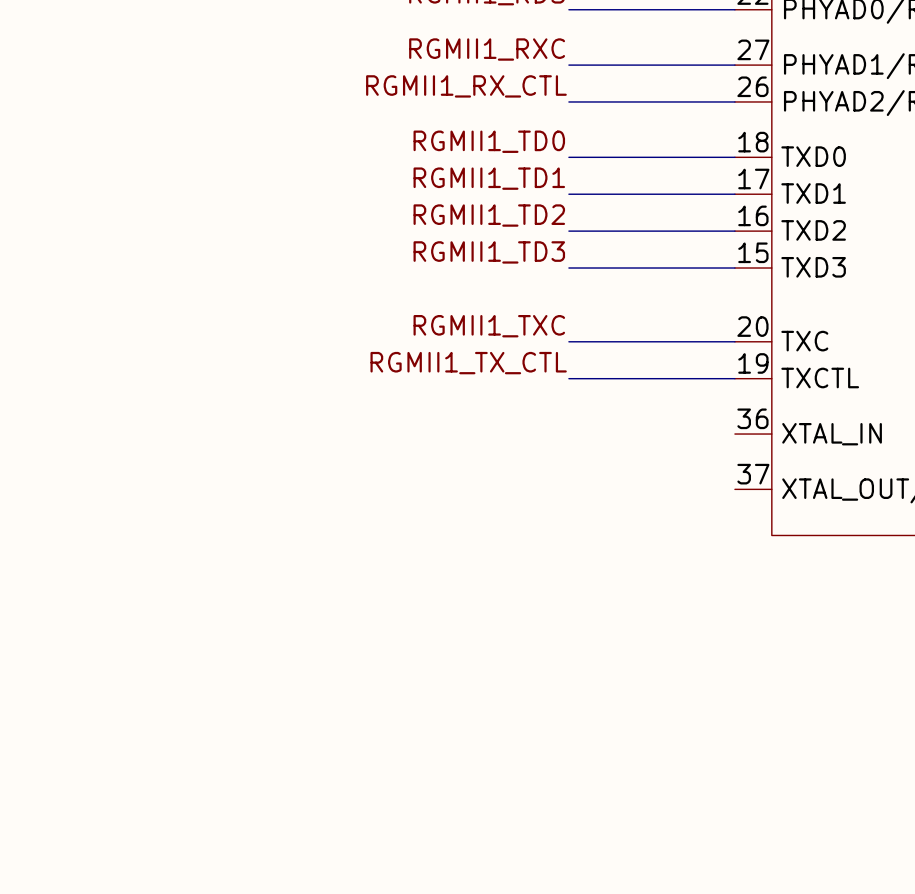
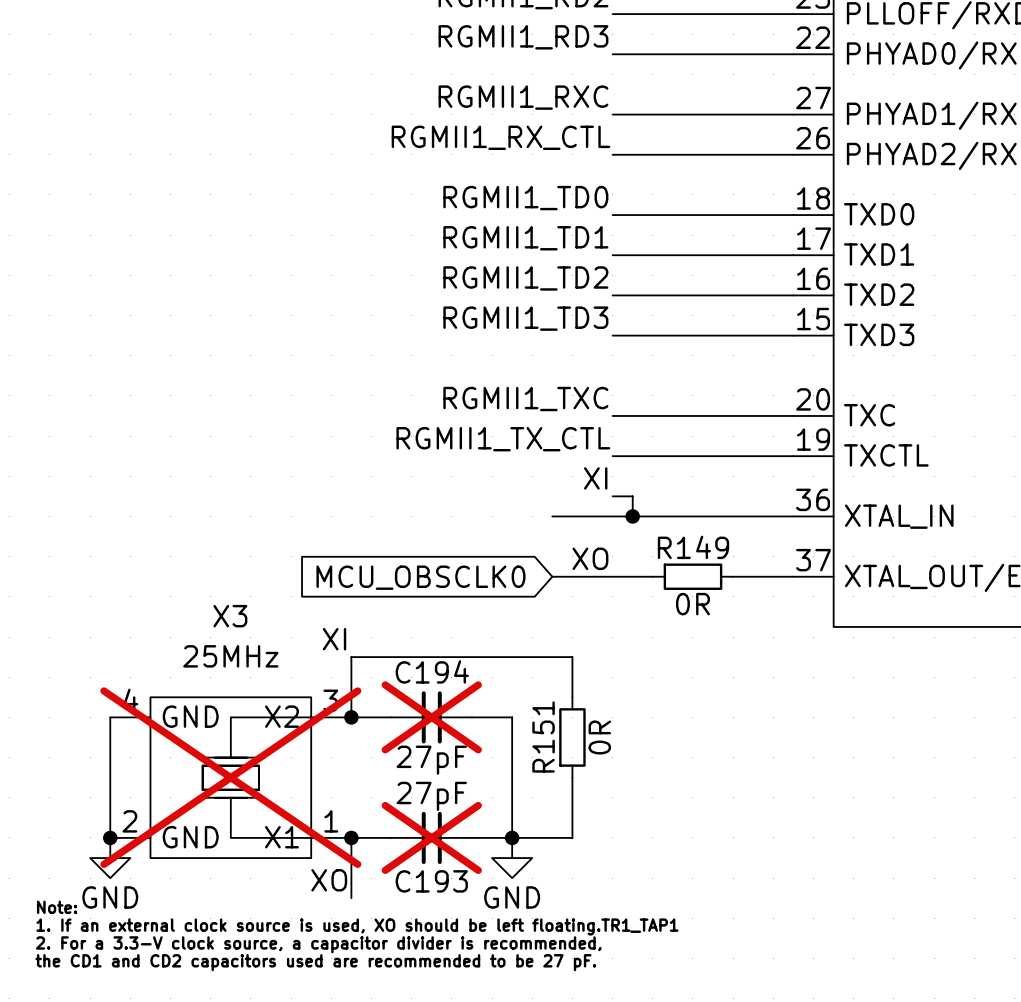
label: none -> XI (595, 478)
wire: none -> (612, 496) (632, 496) (632, 516)
wire: none -> (552, 516) (793, 516)
junction: none -> (632, 516)
label: none -> XO (590, 558)
wire: none -> (552, 576) (652, 576)
R149: none -> (692, 576)
wire: none -> (733, 576) (793, 576)
global label: none -> MCU_OBSCLK0 (420, 577)
label: none -> XI (334, 639)
wire: none -> (572, 697) (572, 657) (351, 657) (351, 717) (391, 717)
wire: none -> (110, 717) (110, 837)
junction: none -> (351, 717)
C194: none -> (431, 717)
wire: none -> (471, 717) (512, 717) (512, 837)
R151: none -> (572, 737)
X3: none -> (230, 777)
wire: none -> (572, 777) (572, 837) (471, 837)
junction: none -> (110, 837)
junction: none -> (351, 837)
wire: none -> (391, 837) (351, 837) (351, 898)
C193: none -> (431, 837)
junction: none -> (512, 837)
power symbol: none -> GND (110, 858)
power symbol: none -> GND (512, 858)
label: none -> XO (329, 880)
text: none -> Note: (57, 907)
text: none -> 1. If an external clock source is used, XO should be left floating.TR1_TAP1 (357, 926)
text: none -> 2. For a 3.3-V clock source, a capacitor divider is recommended, (318, 944)
text: none -> the CD1 and CD2 capacitors used are recommended to be 27 pF. (315, 962)

